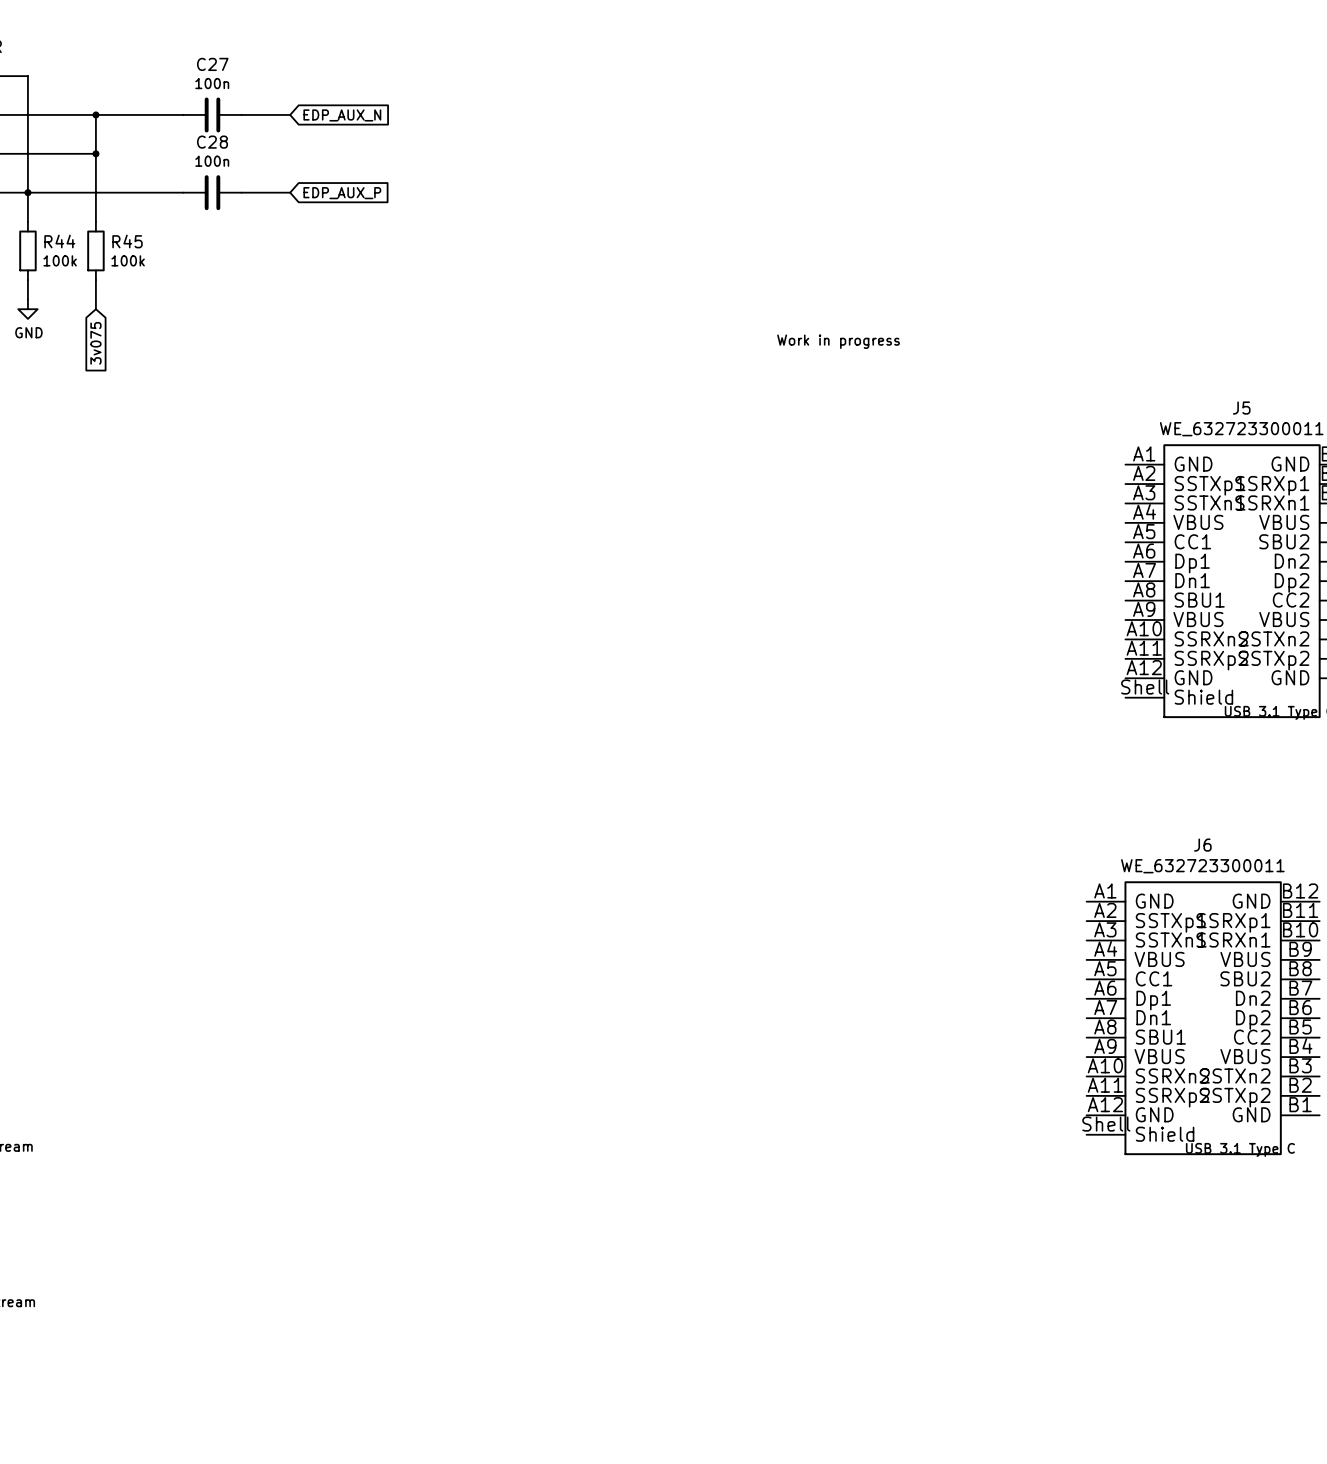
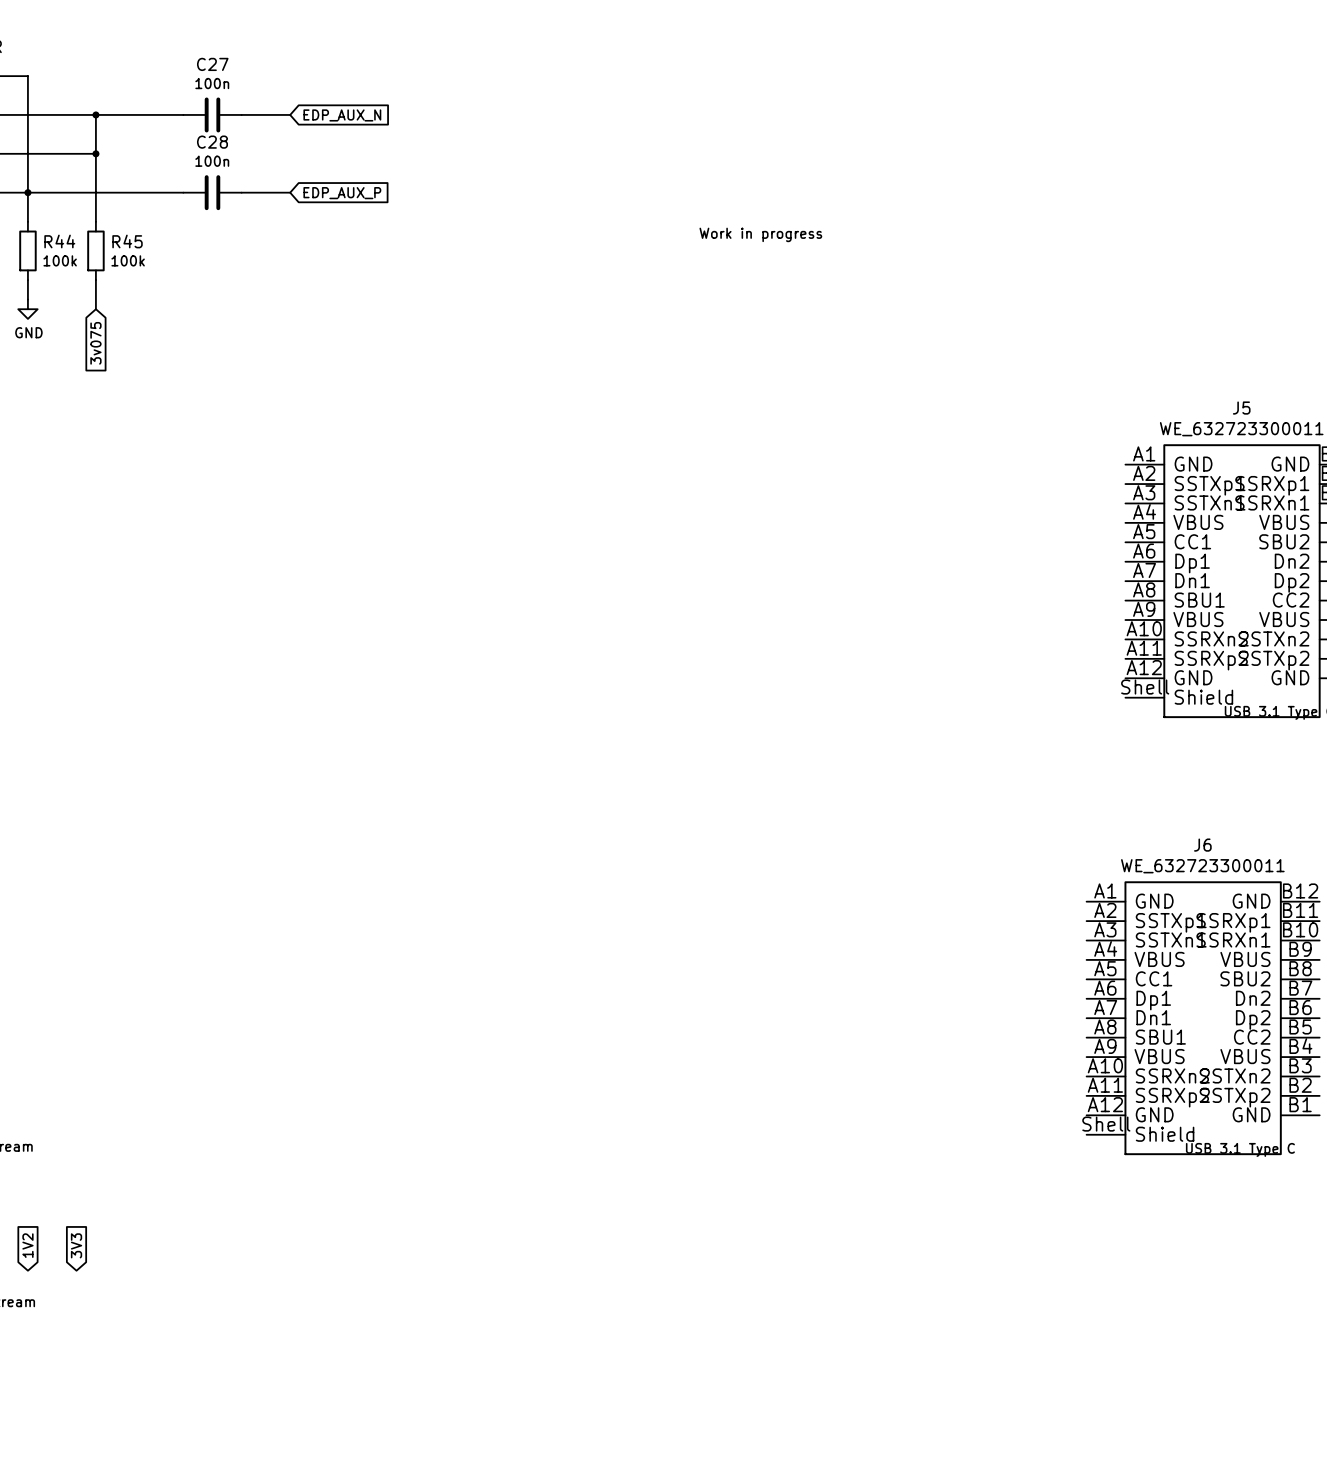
text position: Work in progress (838, 341) -> Work in progress (760, 234)
global label: none -> 1V2 (27, 1245)
global label: none -> 3V3 (76, 1245)

